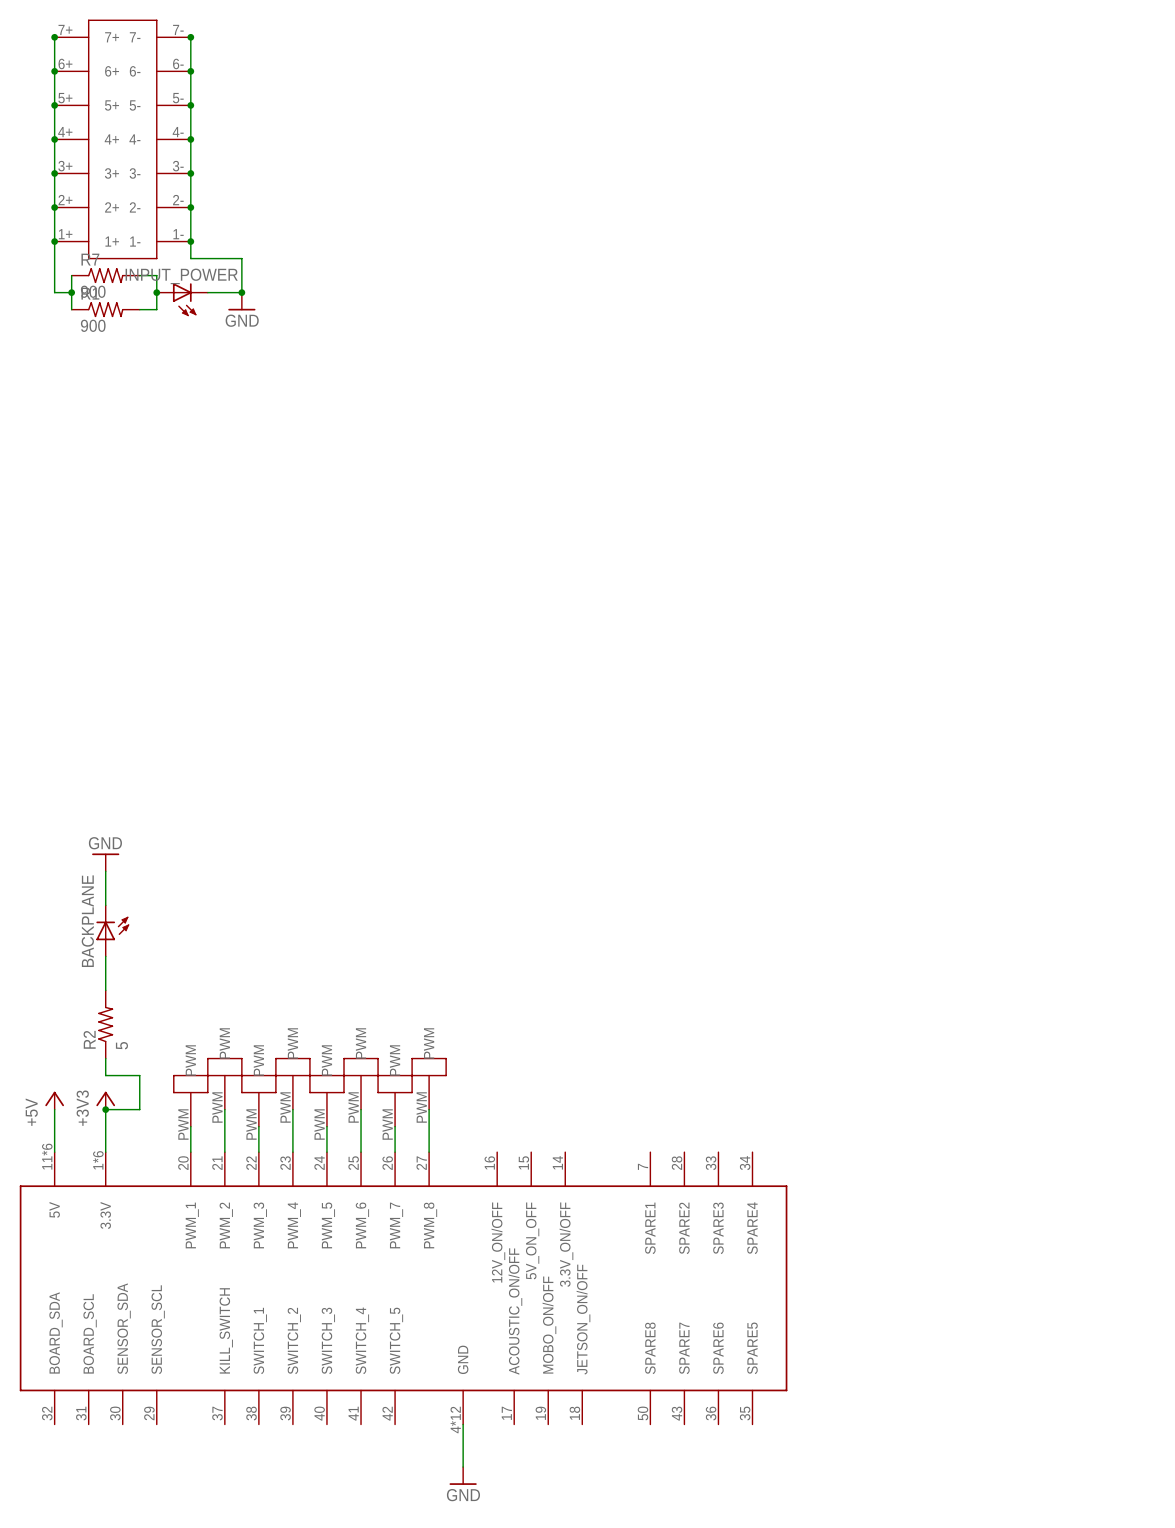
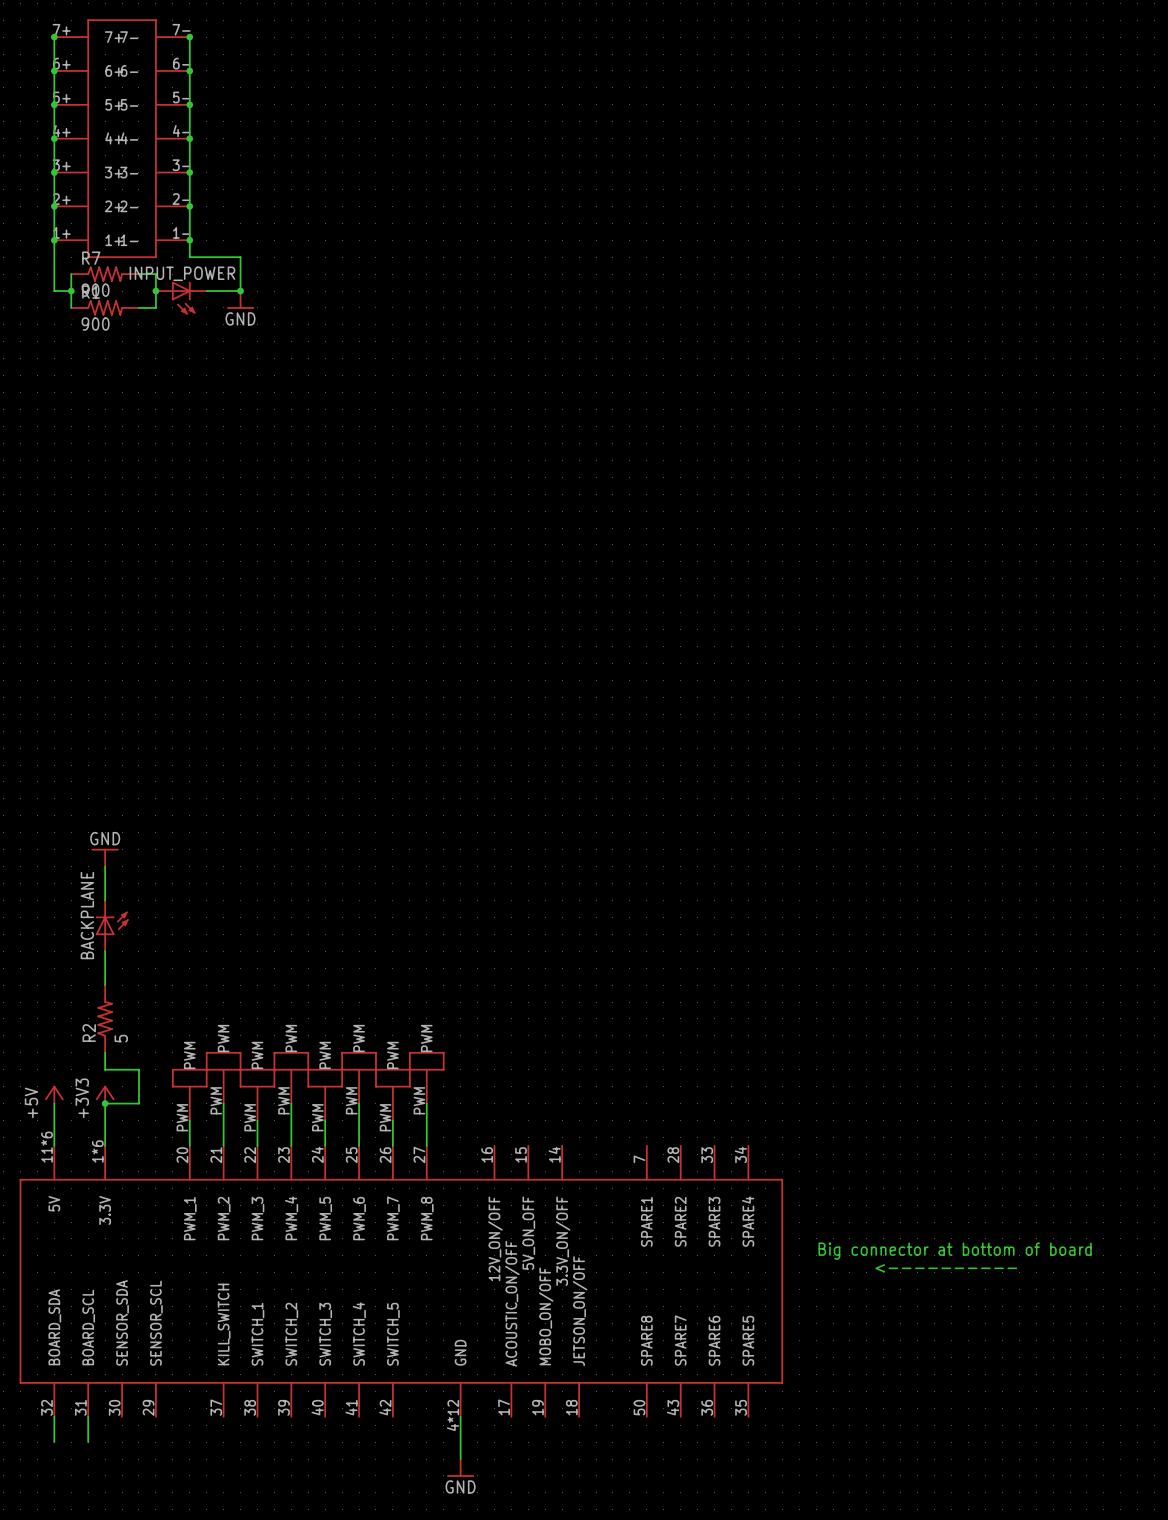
text: none -> Big connector at bottom of board (955, 1251)
text: none -> <---------- (946, 1268)
wire: none -> (54, 1416) (54, 1442)
wire: none -> (88, 1416) (88, 1442)

